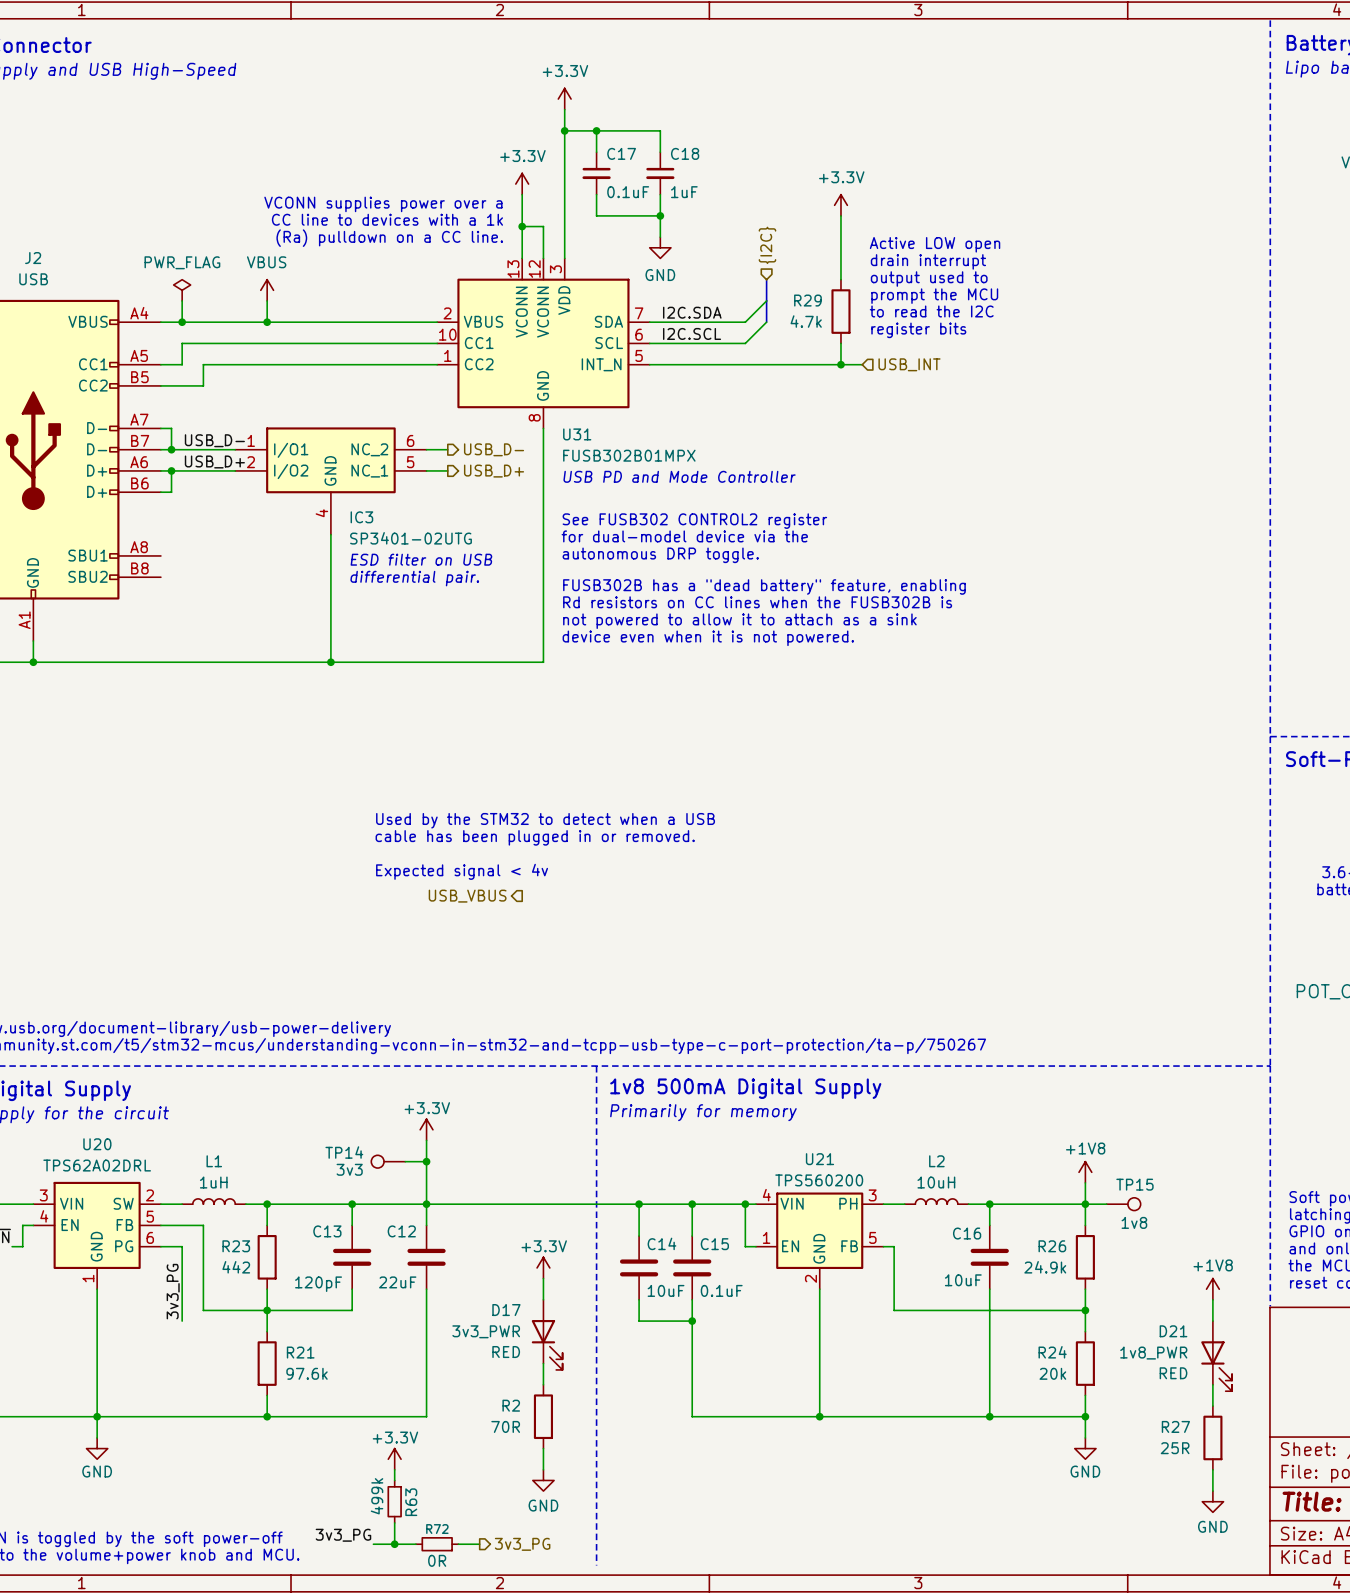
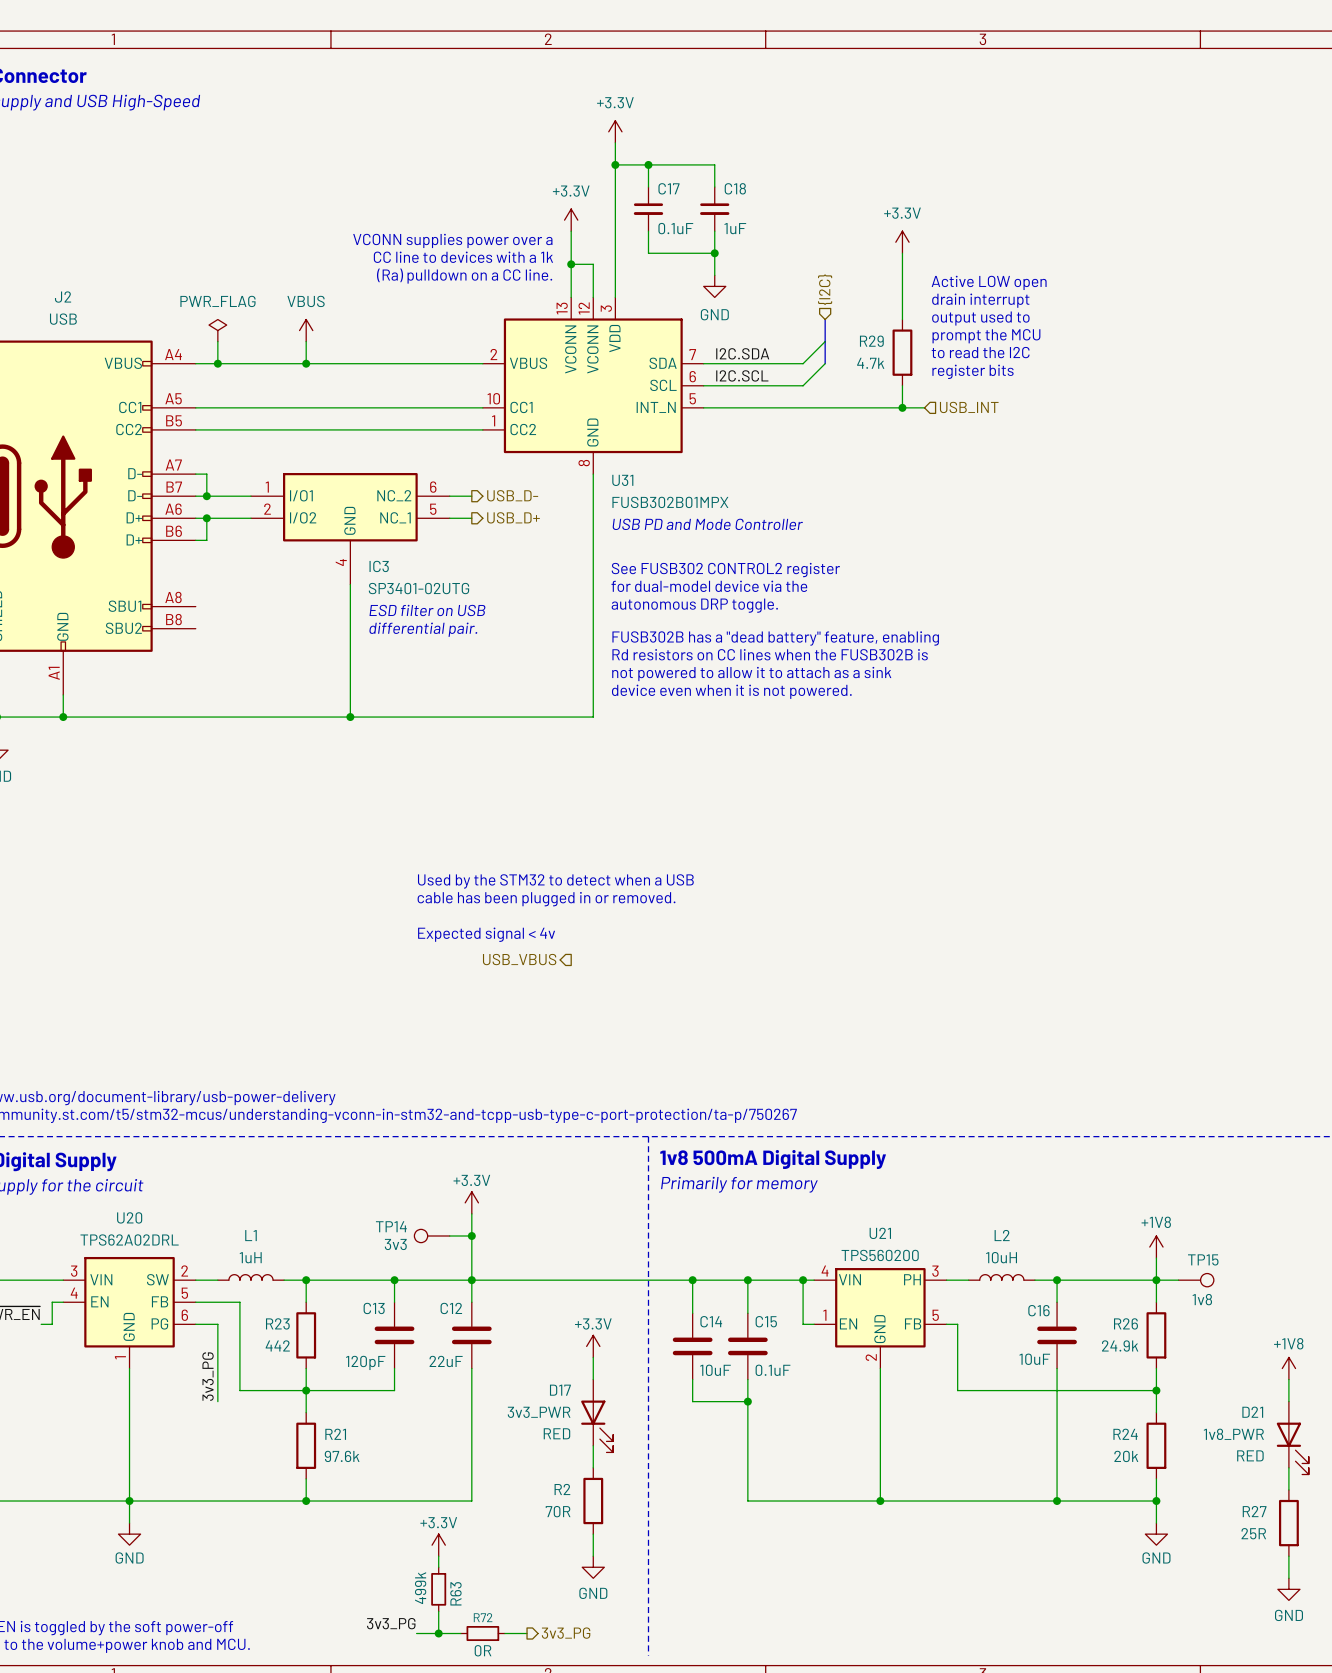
U31 symbol: [437, 258, 650, 429] -> [482, 297, 704, 475]
wire: (437, 343) (182, 343) (182, 364) -> none
wire: (203, 364) (203, 385) -> (239, 407) (217, 407)
wire: none -> (239, 429) (482, 429)
label: USB_D- (214, 440) -> none
hierarchical label position: USB_D- (494, 449) -> USB_D- (512, 495)
label: USB_D+ (214, 461) -> none
hierarchical label position: USB_D+ (494, 471) -> USB_D+ (513, 517)
IC3 position: (330, 481) -> (350, 528)
wire: (330, 534) (330, 662) -> (350, 584) (350, 717)
text position: ESD filter on USB (421, 559) -> ESD filter on USB (427, 610)
text position: differential pair. (414, 578) -> differential pair. (423, 629)
junction position: (330, 662) -> (350, 717)

